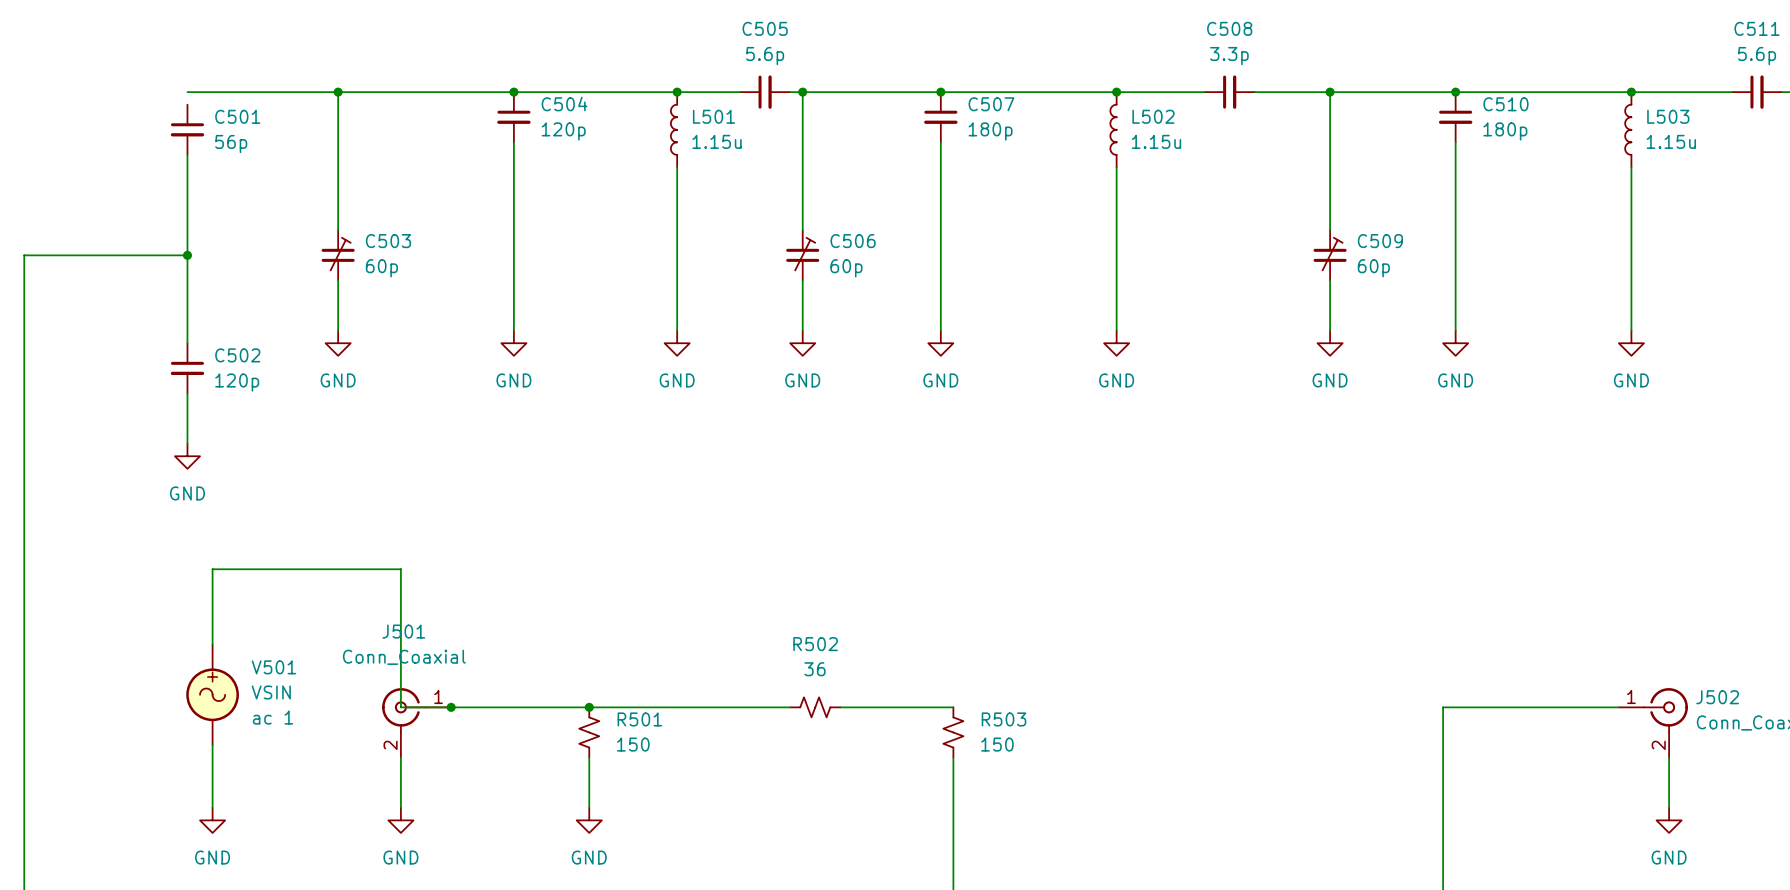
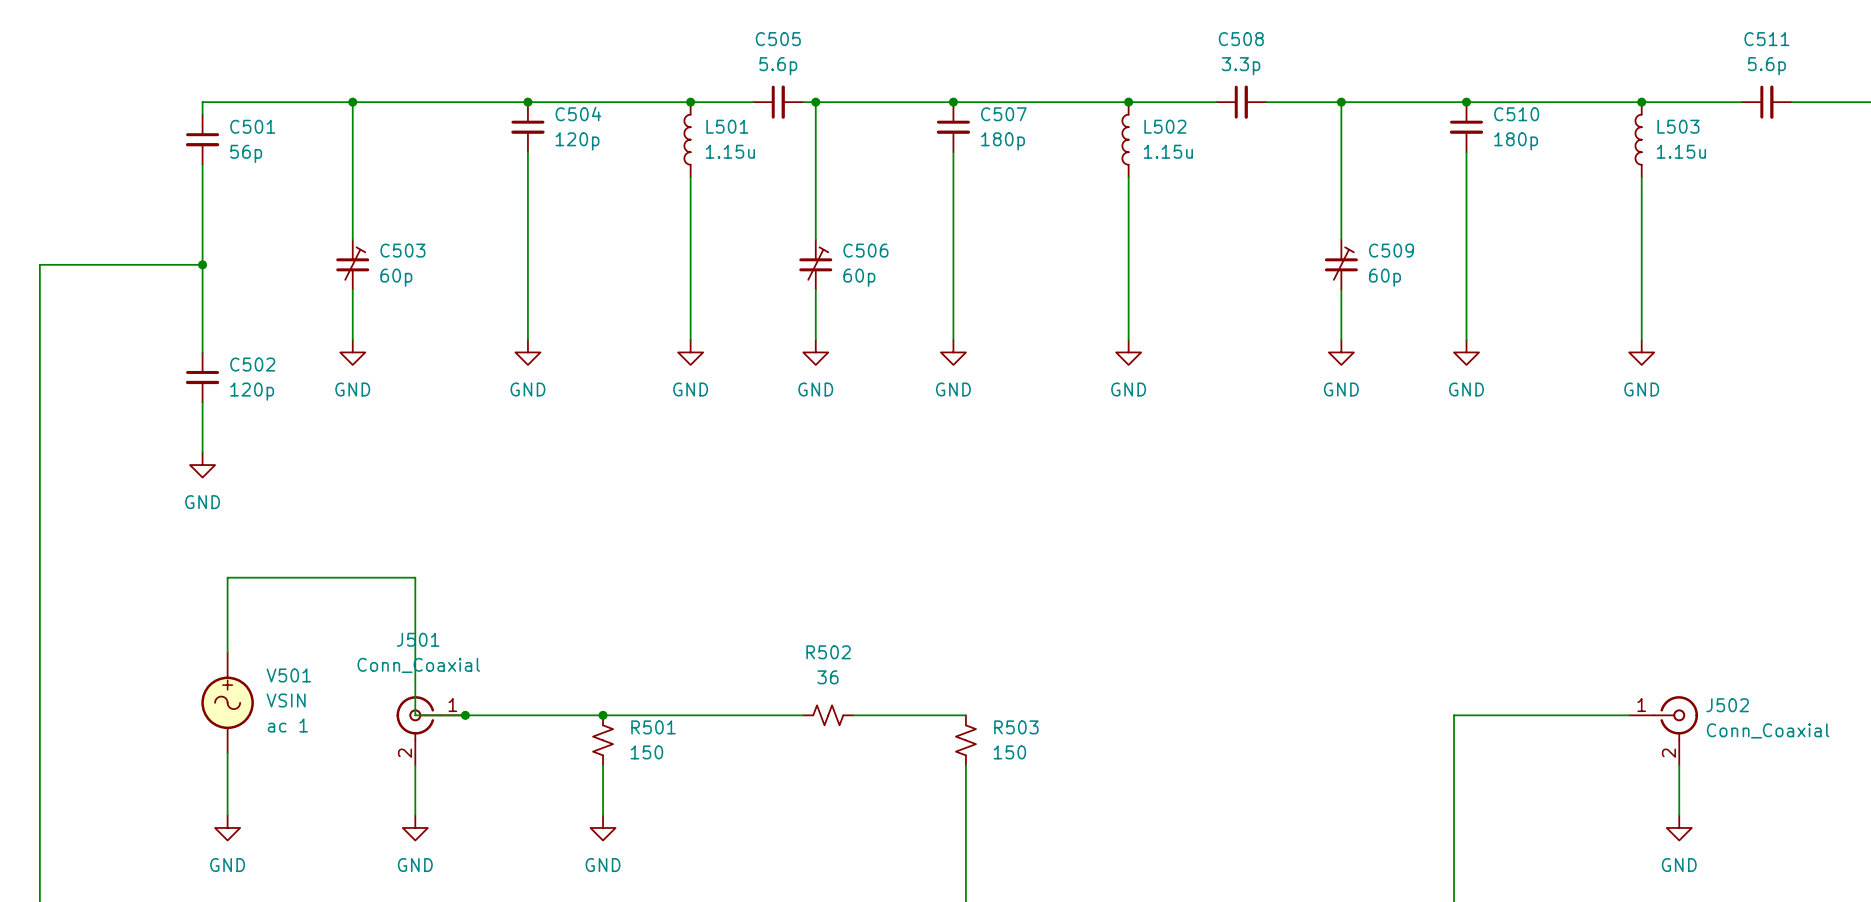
wire: none -> (202, 102) (202, 114)

